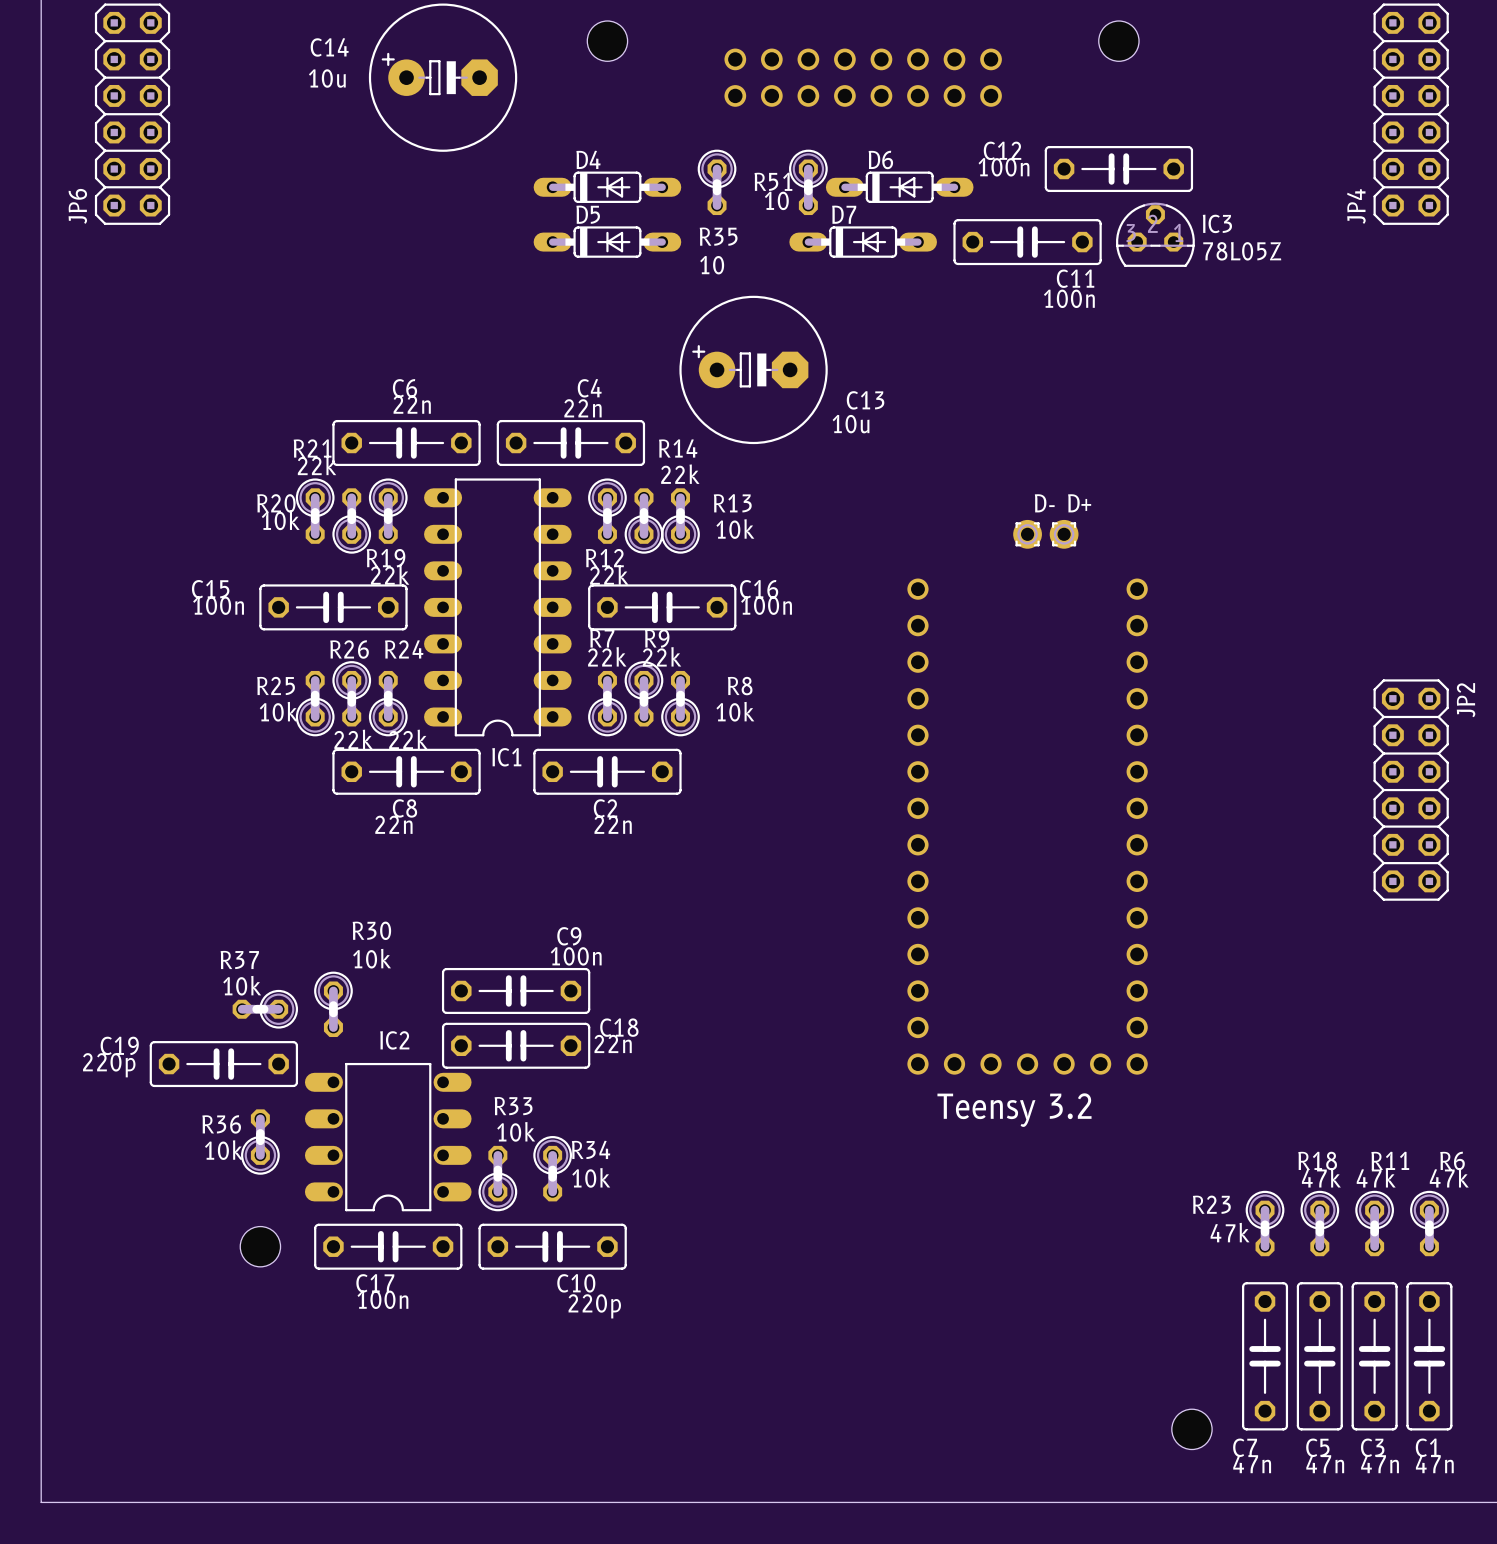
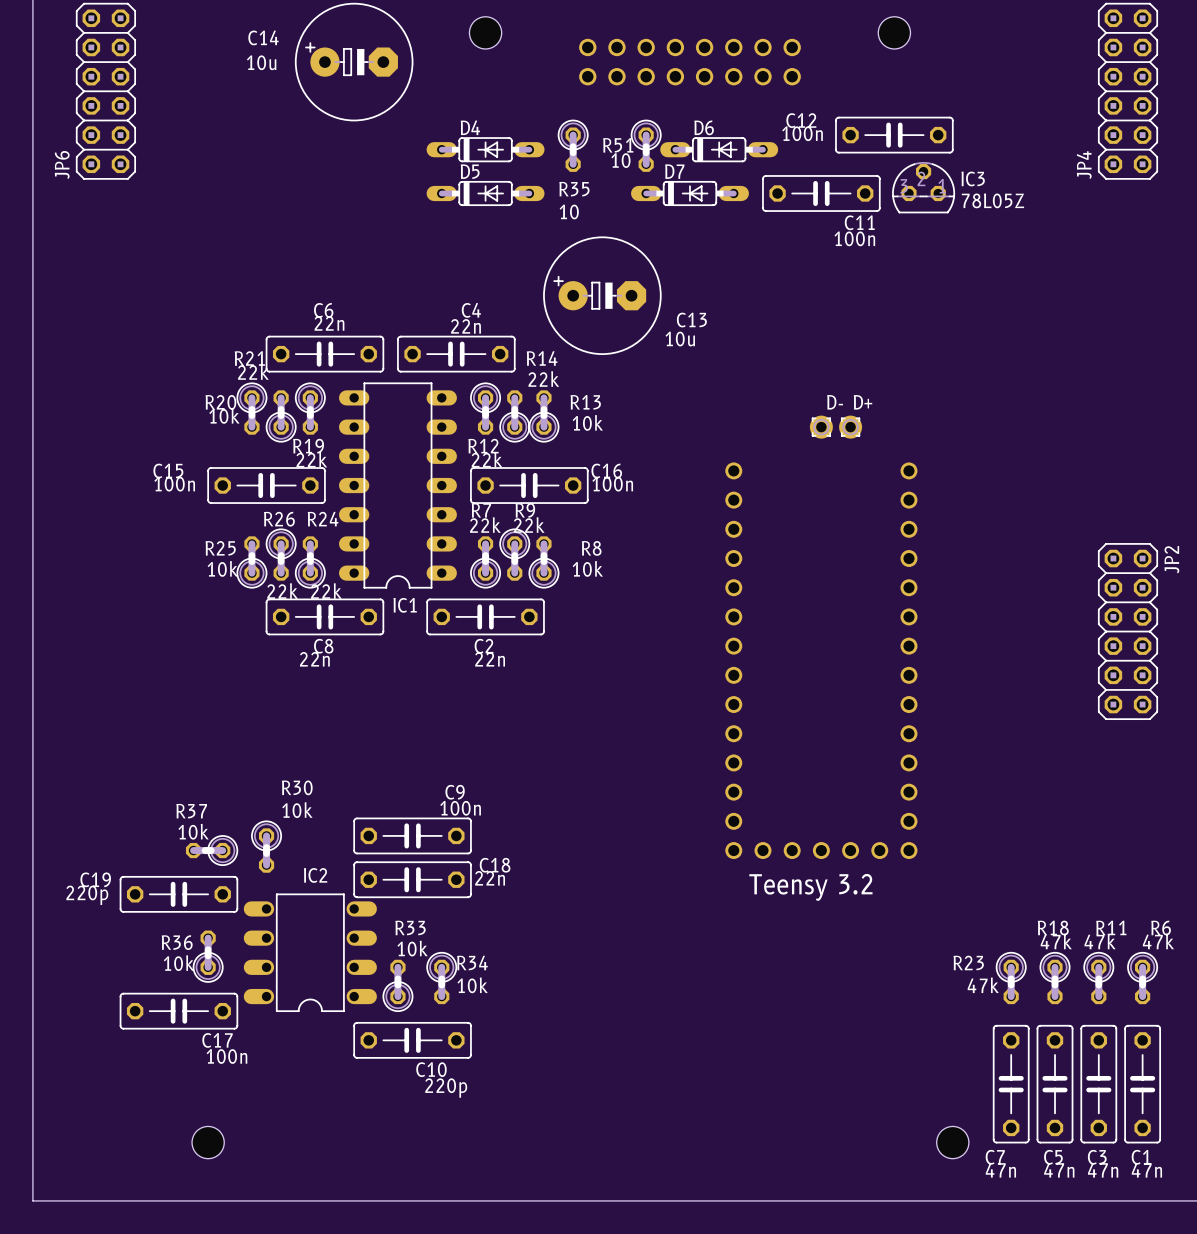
C18 value: 100n (576, 956) -> 22n (490, 878)
C9: 22n (516, 990) -> none
R30 position: (333, 1004) -> (266, 846)
R37 position: (265, 1009) -> (212, 850)
C18 name: C18 (619, 1027) -> C9 (455, 792)
C19 position: (223, 1064) -> (178, 894)
C18: none -> 100n (412, 879)
IC2 position: (388, 1137) -> (310, 952)
R36 position: (260, 1142) -> (208, 956)
R34 position: (552, 1168) -> (441, 978)
R33 position: (497, 1178) -> (397, 985)
hole position: (260, 1246) -> (208, 1142)
C17 position: (388, 1246) -> (178, 1011)
C10 position: (552, 1246) -> (412, 1040)
C17 name position: C17 (375, 1283) -> C17 (217, 1040)
C17 value position: 100n (382, 1299) -> 100n (226, 1056)

